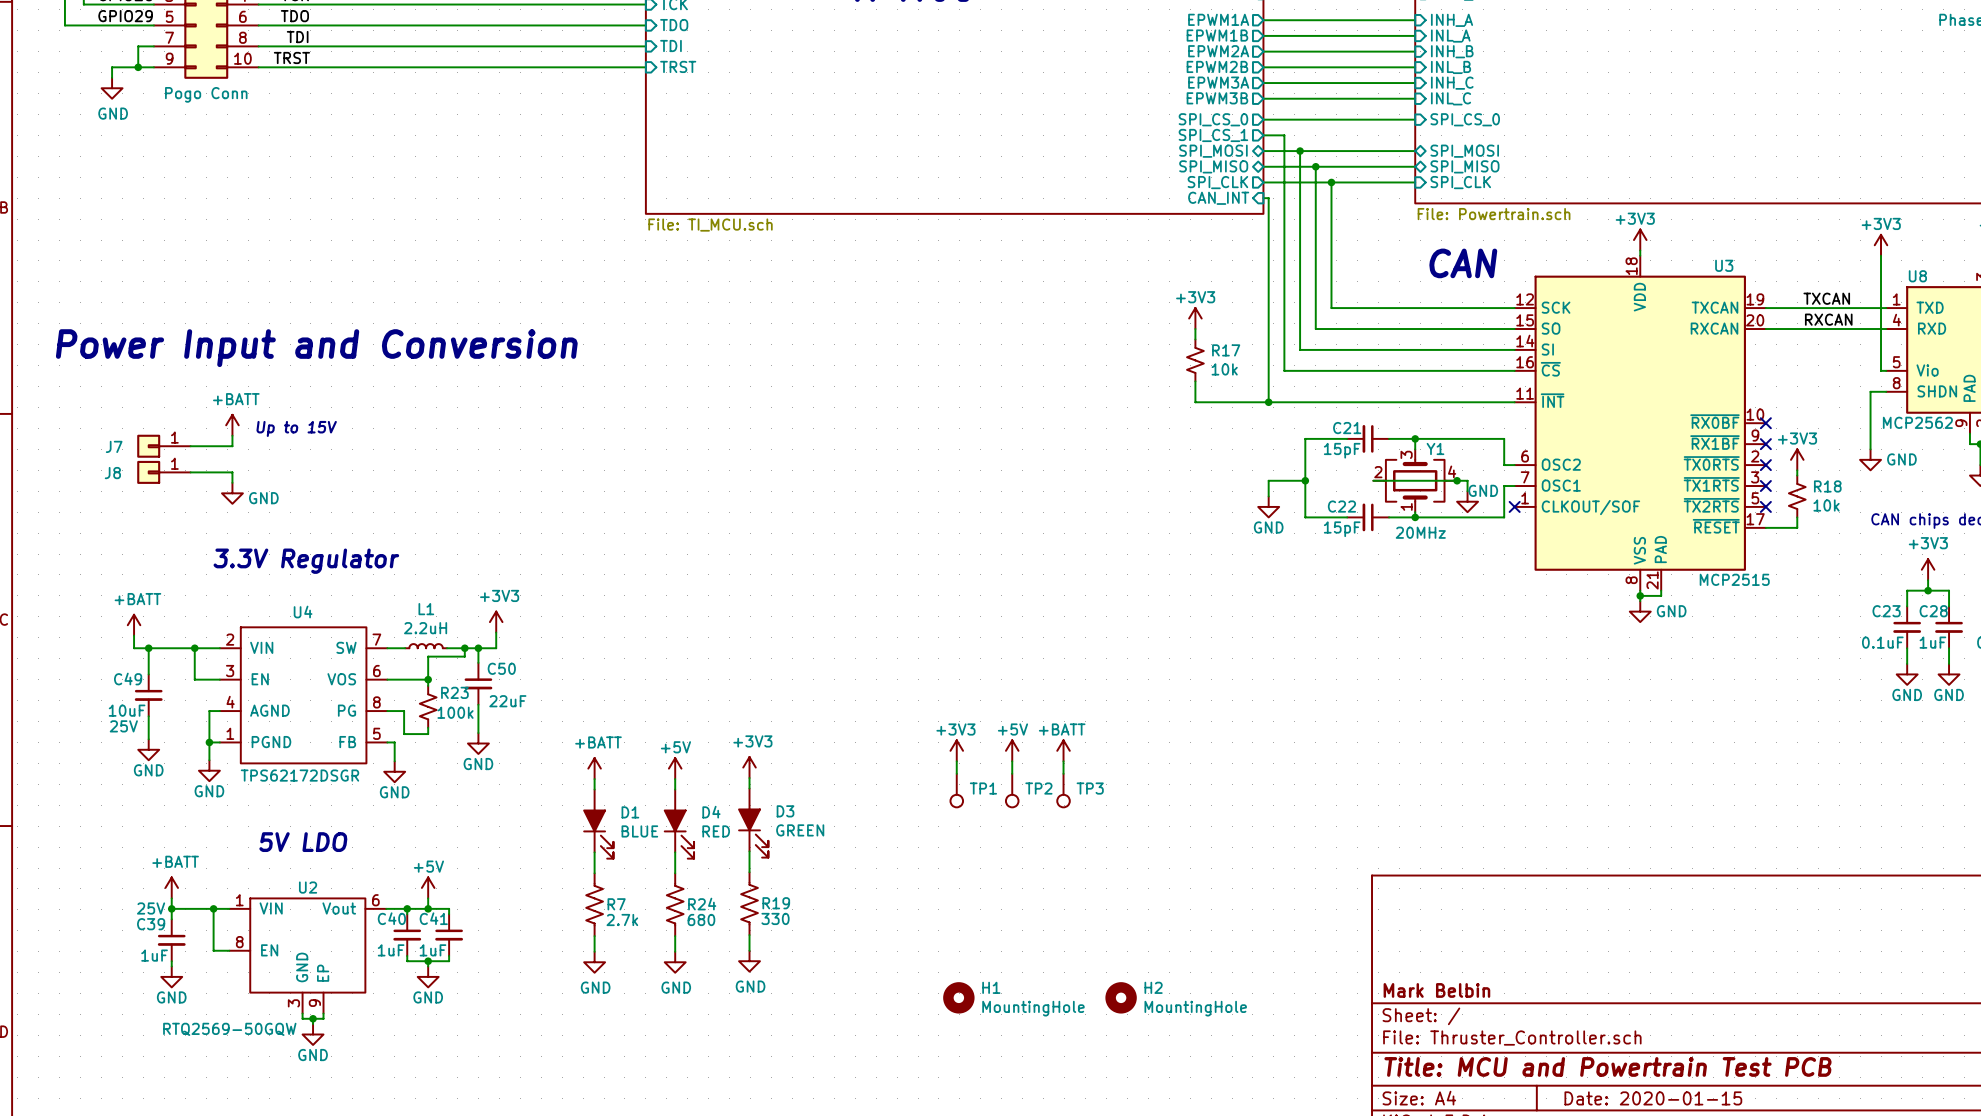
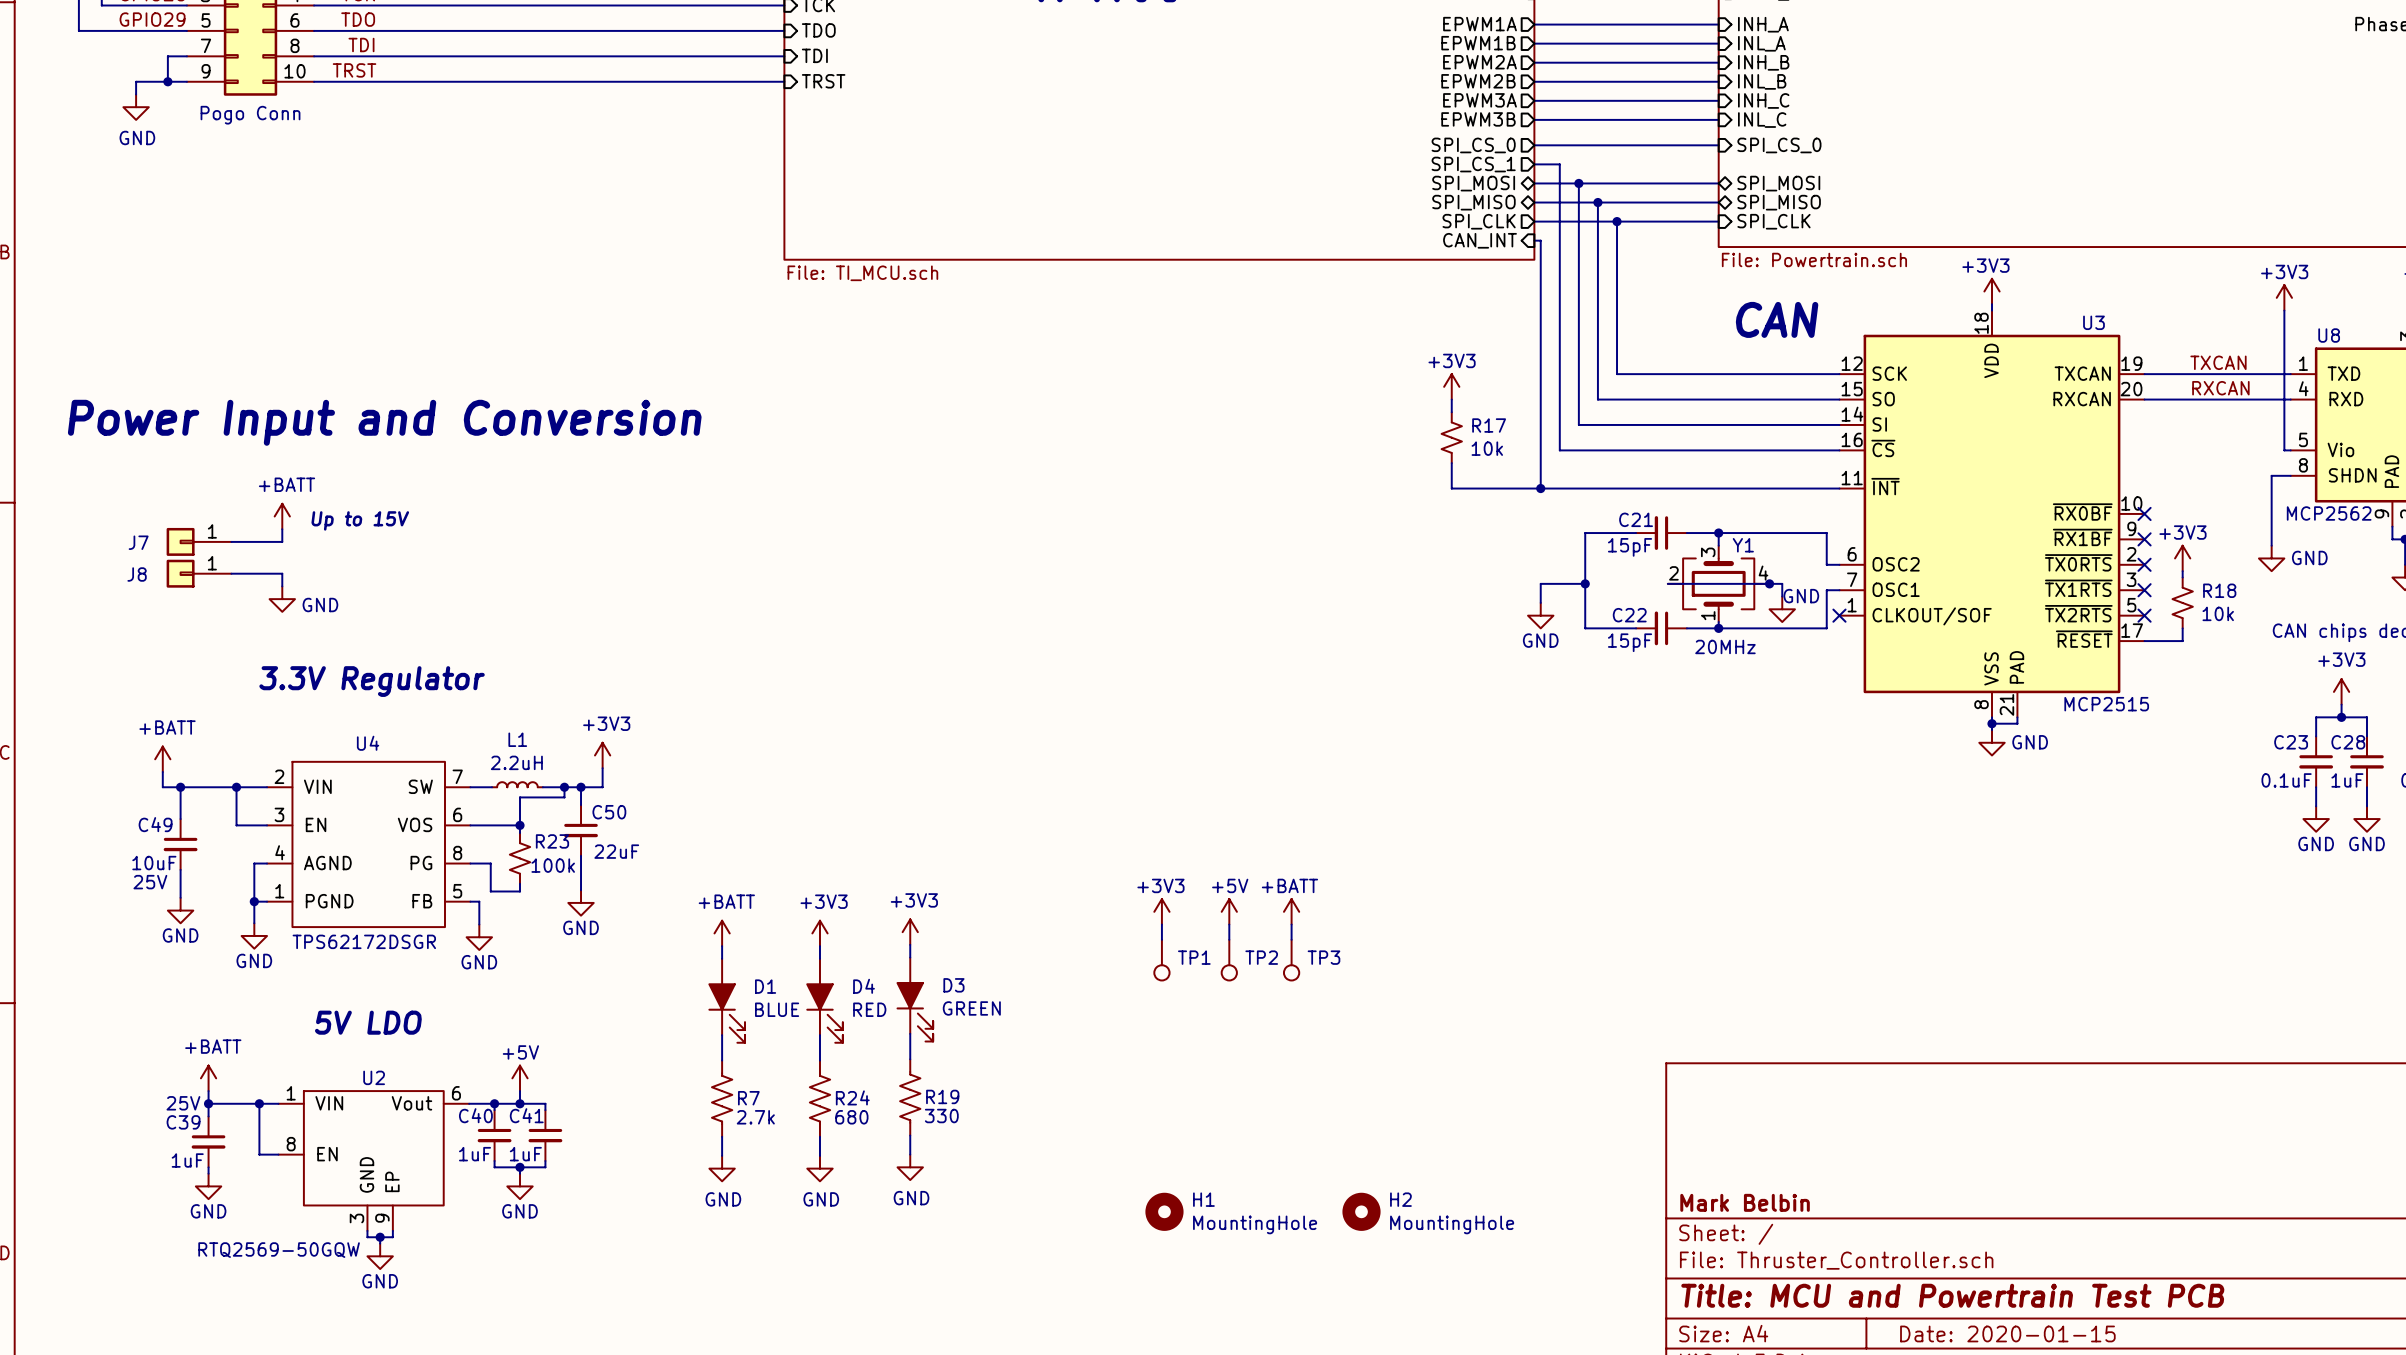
power symbol: +5V (675, 768) -> +3V3 (819, 933)

